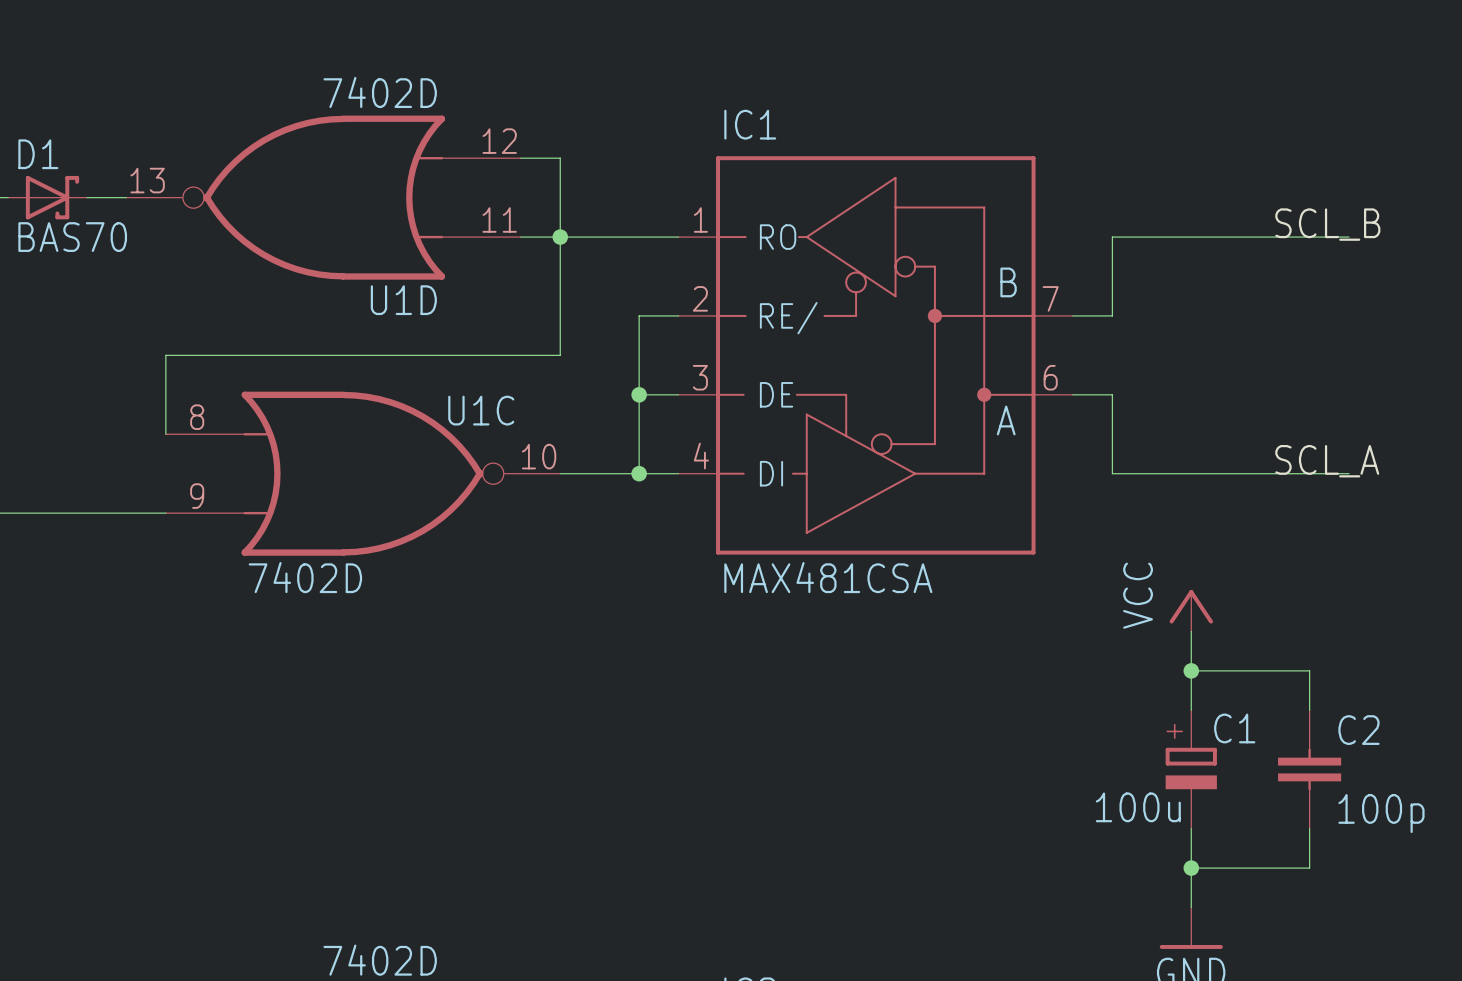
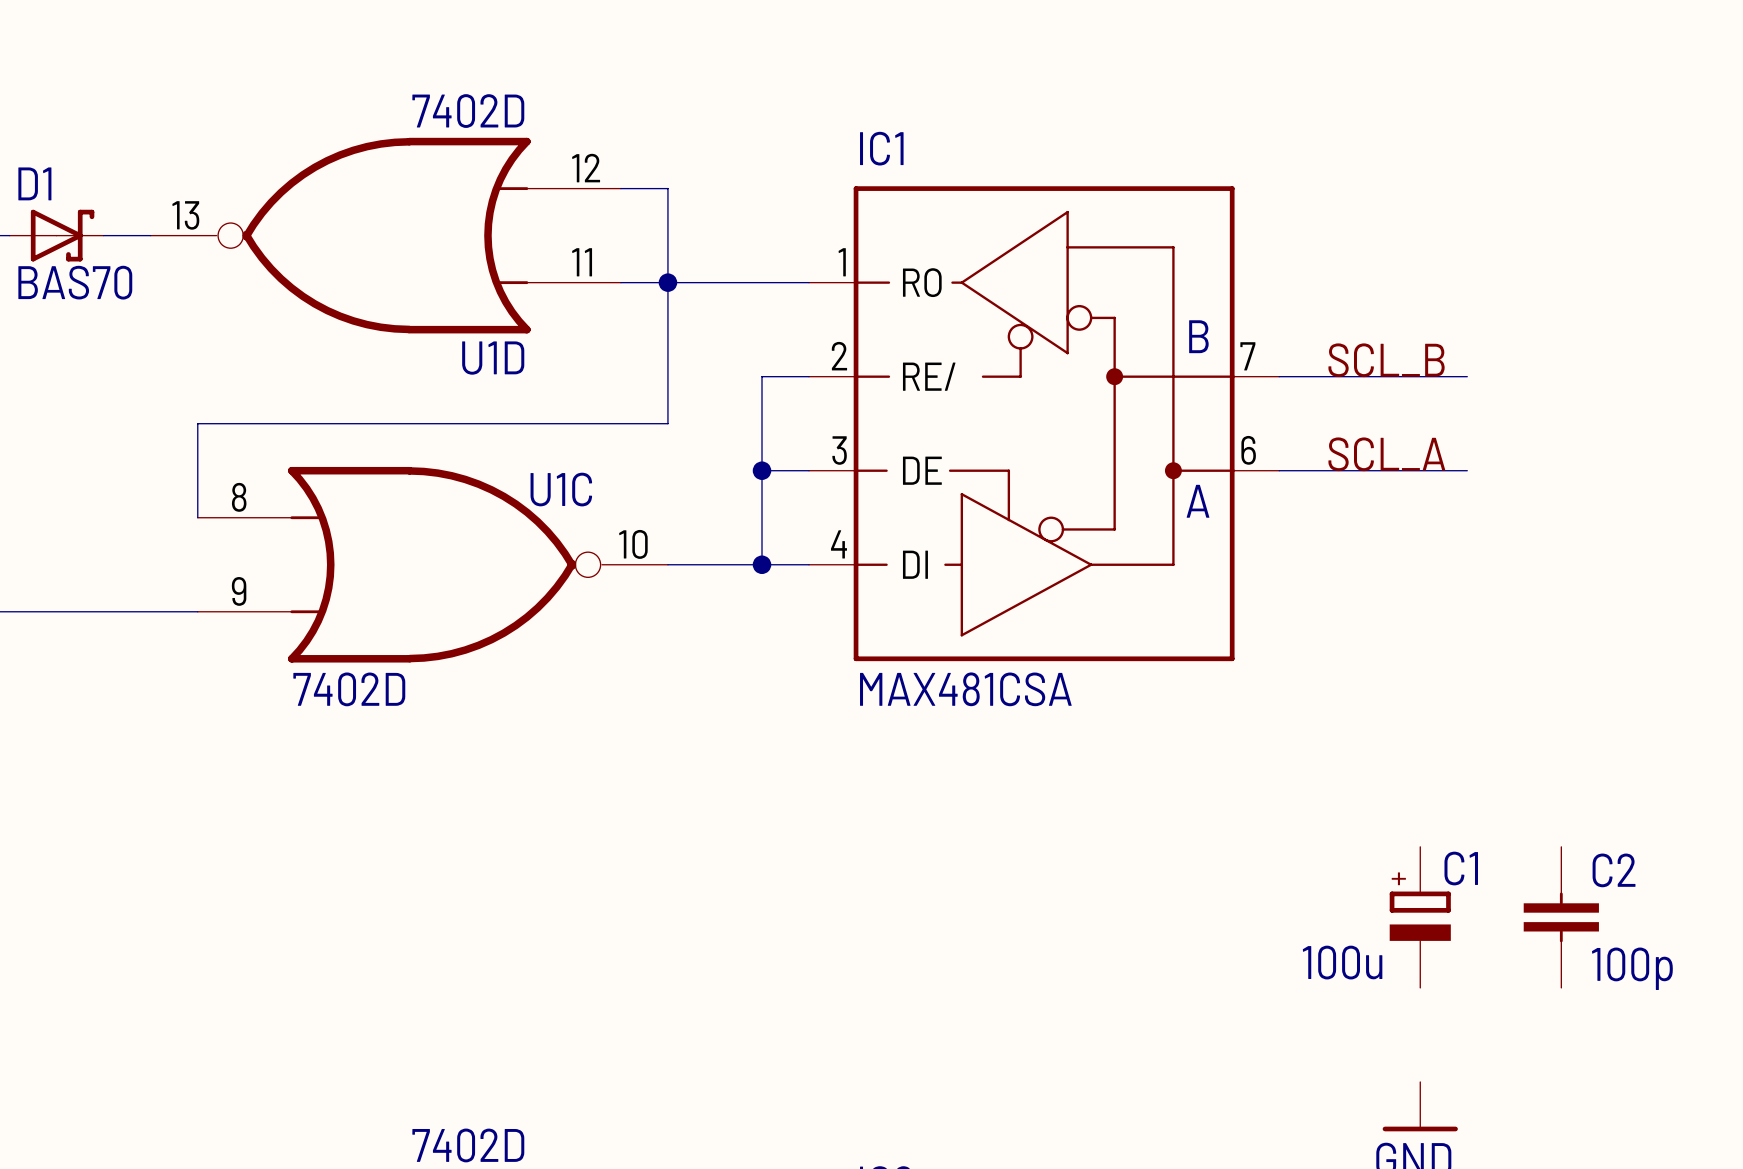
label position: SCL_B (1327, 224) -> SCL_B (1386, 360)
wire: (1349, 237) (1112, 237) (1112, 315) -> (1467, 376) (1326, 376)
wire: (1112, 394) (1112, 473) (1349, 473) -> (1326, 470) (1467, 470)
label position: SCL_A (1327, 461) -> SCL_A (1386, 454)
power symbol: VCC (1191, 610) -> none
wire: (1191, 631) (1191, 710) -> none
wire: (1191, 670) (1309, 670) (1309, 710) -> none
junction: (1191, 670) -> none
wire: (1191, 828) (1191, 907) -> none
wire: (1309, 828) (1309, 868) (1191, 868) -> none
junction: (1191, 868) -> none

